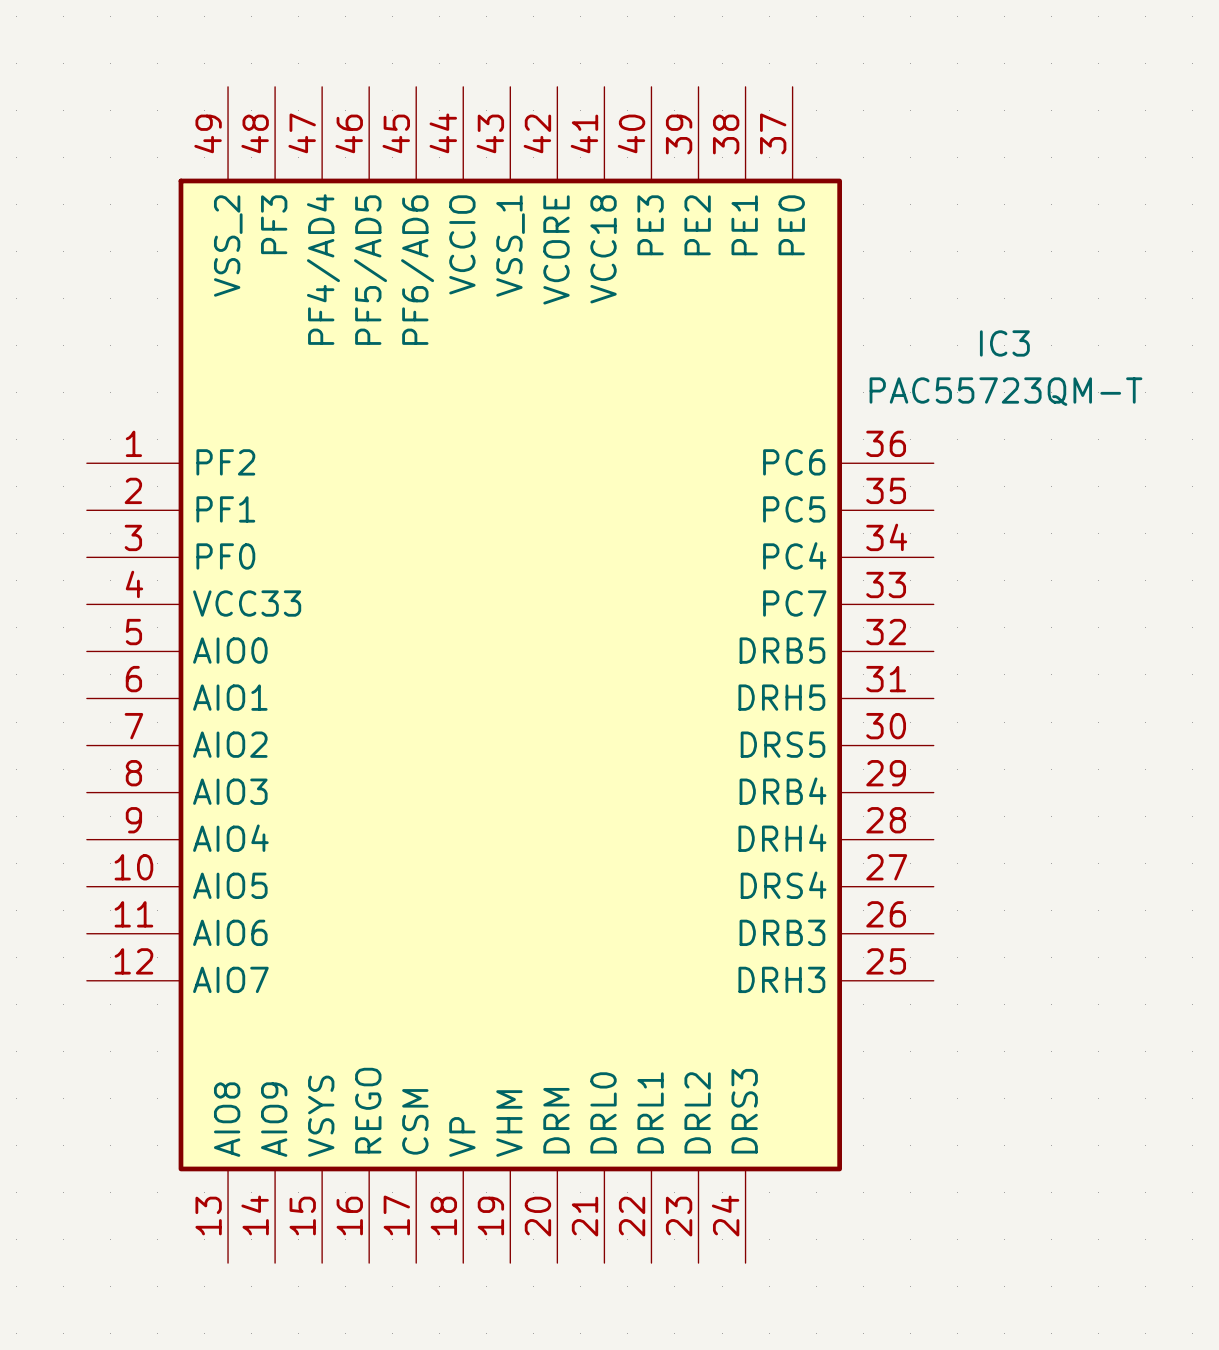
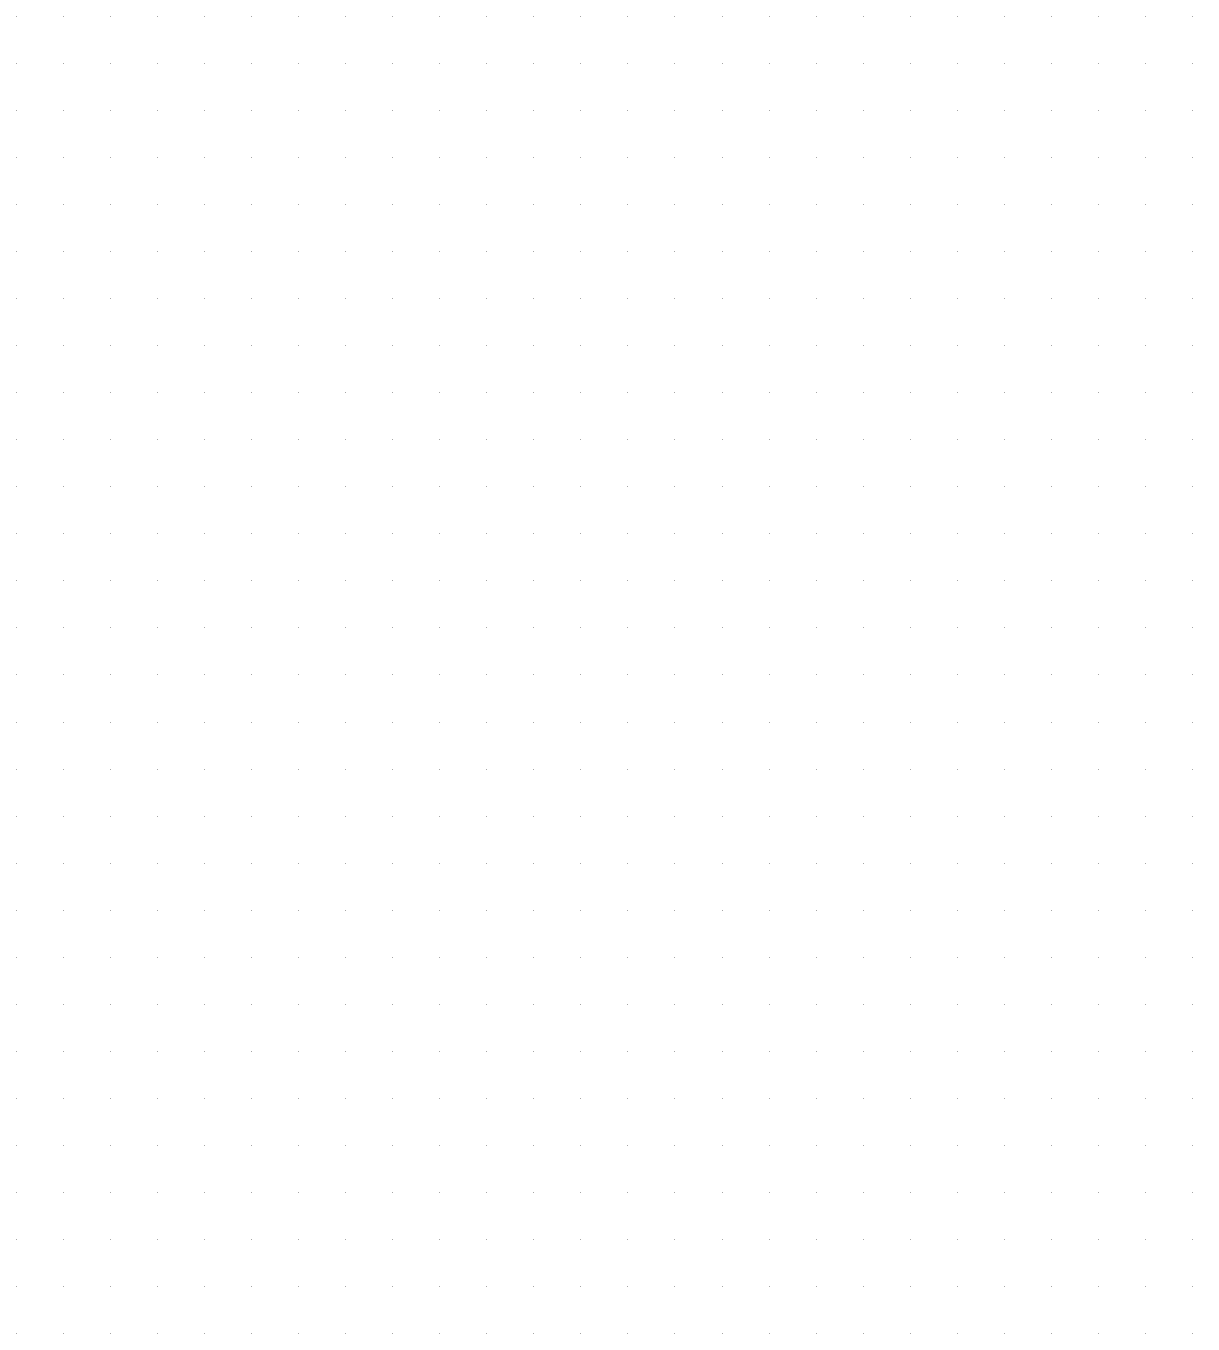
IC3: PAC55723QM-T (510, 674) -> none

